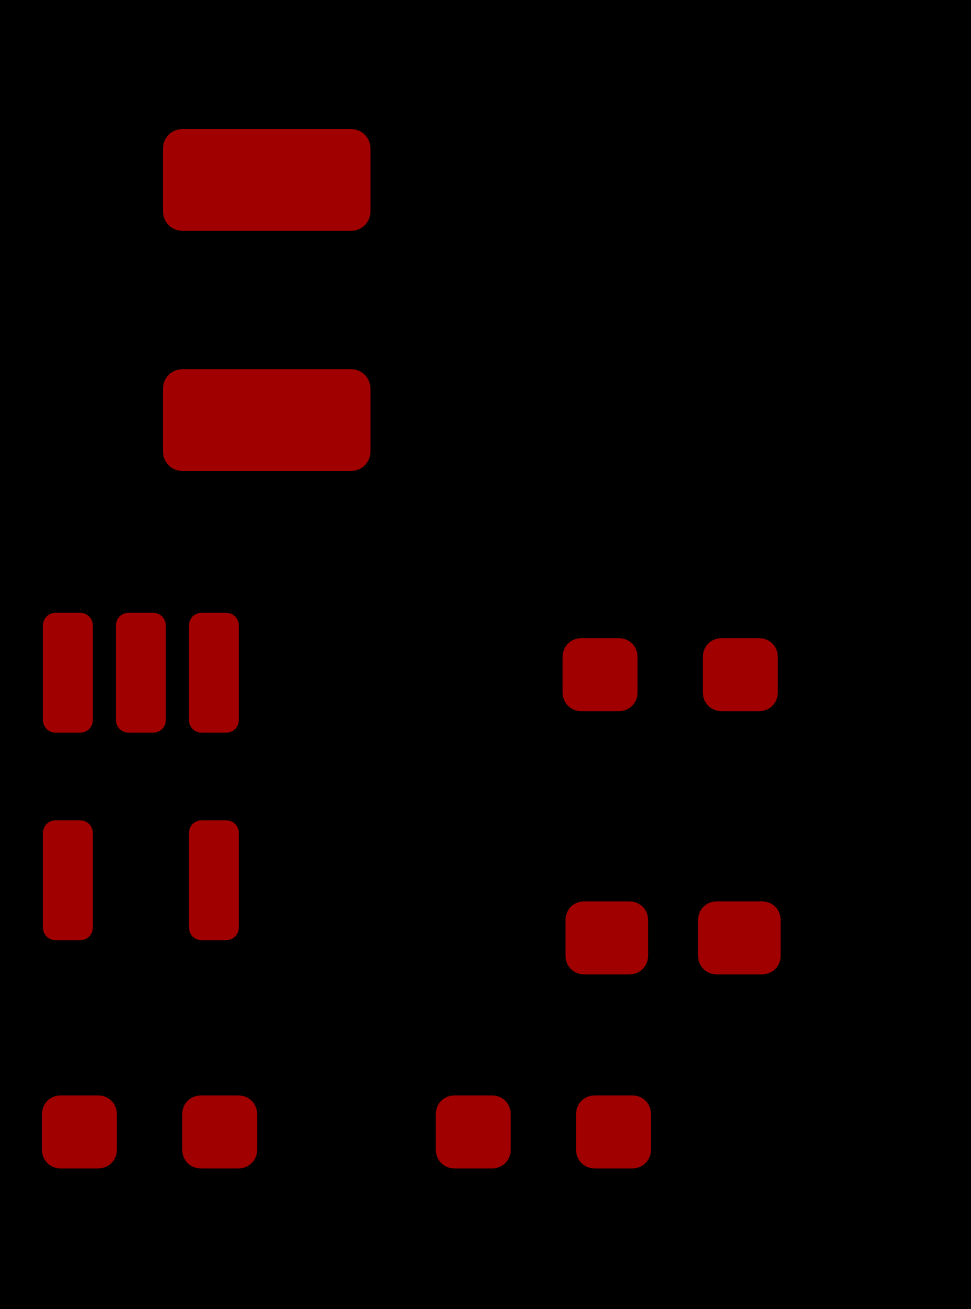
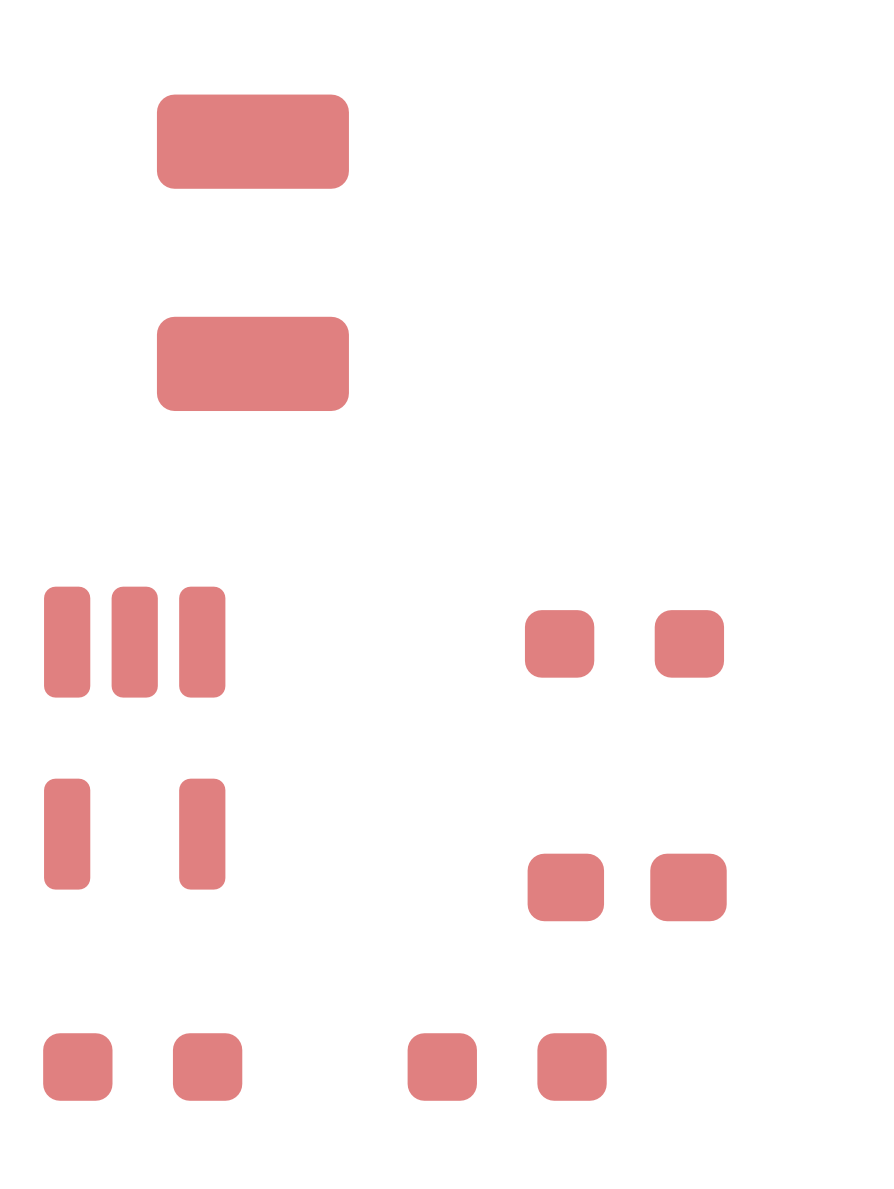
part position: (266, 300) -> (252, 252)

